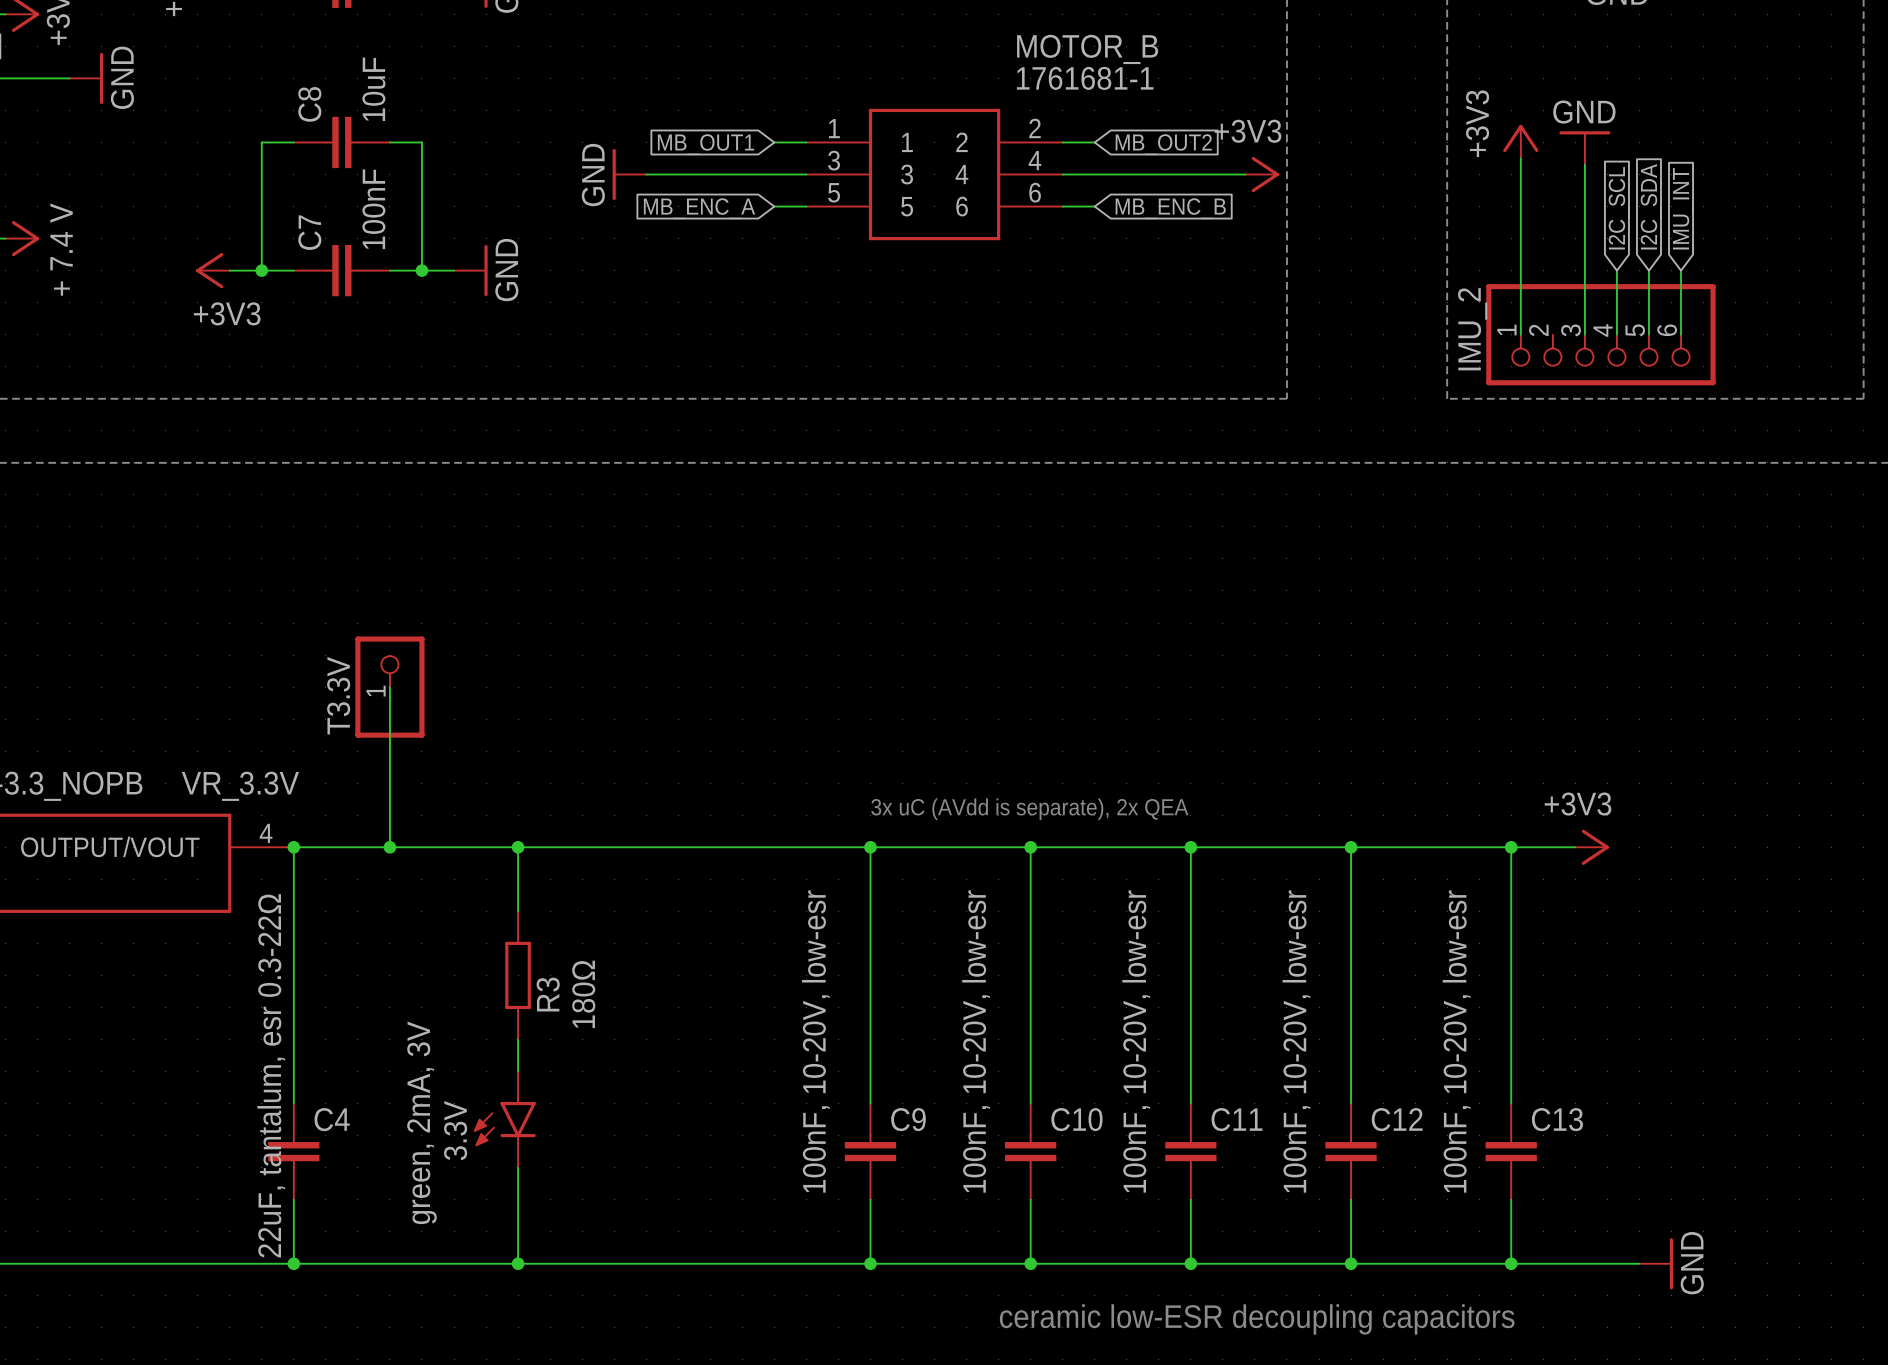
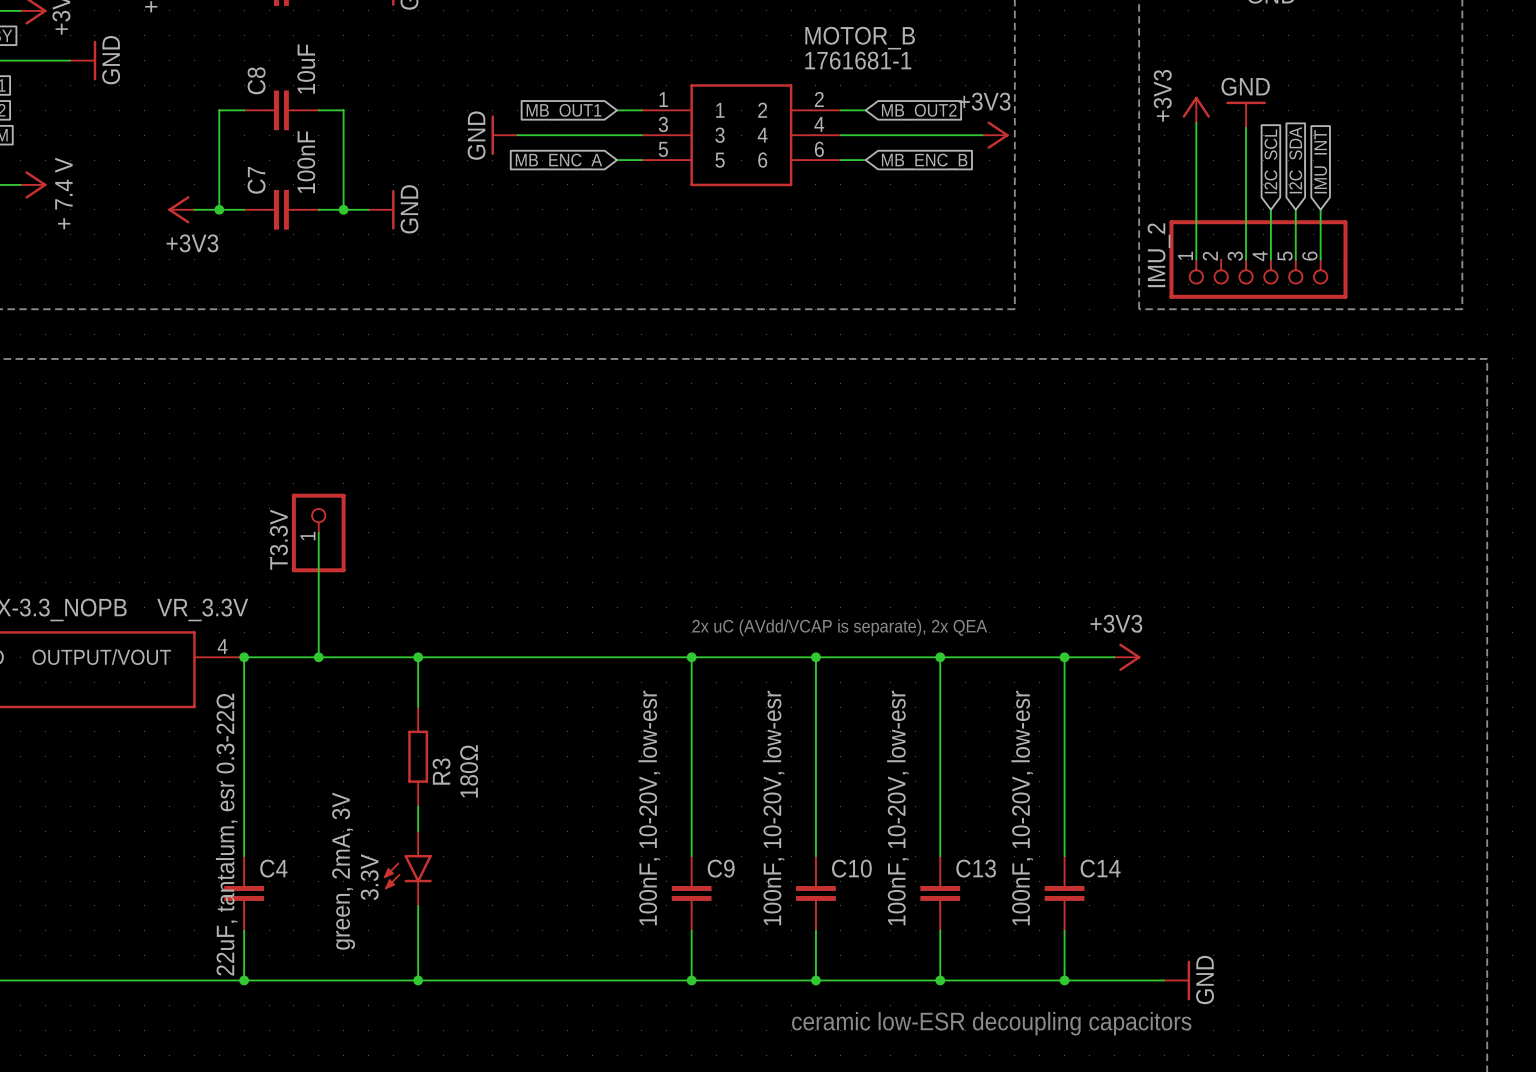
text: 3x uC (AVdd is separate), 2x QEA (1029, 809) -> 2x uC (AVdd/VCAP is separate), 2x QEA (839, 627)
wire: (1415, 847) (1575, 847) -> none
wire: (1511, 847) (1511, 1103) -> none
junction: (1511, 847) -> none
power symbol position: +3V3 (1592, 847) -> +3V3 (1127, 657)
C11 name: C11 (1237, 1119) -> C13 (976, 868)
C12 name: C12 (1397, 1119) -> C14 (1100, 868)
C13: 100nF, 10-20V, low-esr (1511, 1151) -> none
wire: (1511, 1199) (1511, 1263) -> none
wire: (1479, 1263) (1639, 1263) -> none
junction: (1511, 1263) -> none
power symbol position: GND (1656, 1263) -> GND (1177, 980)

